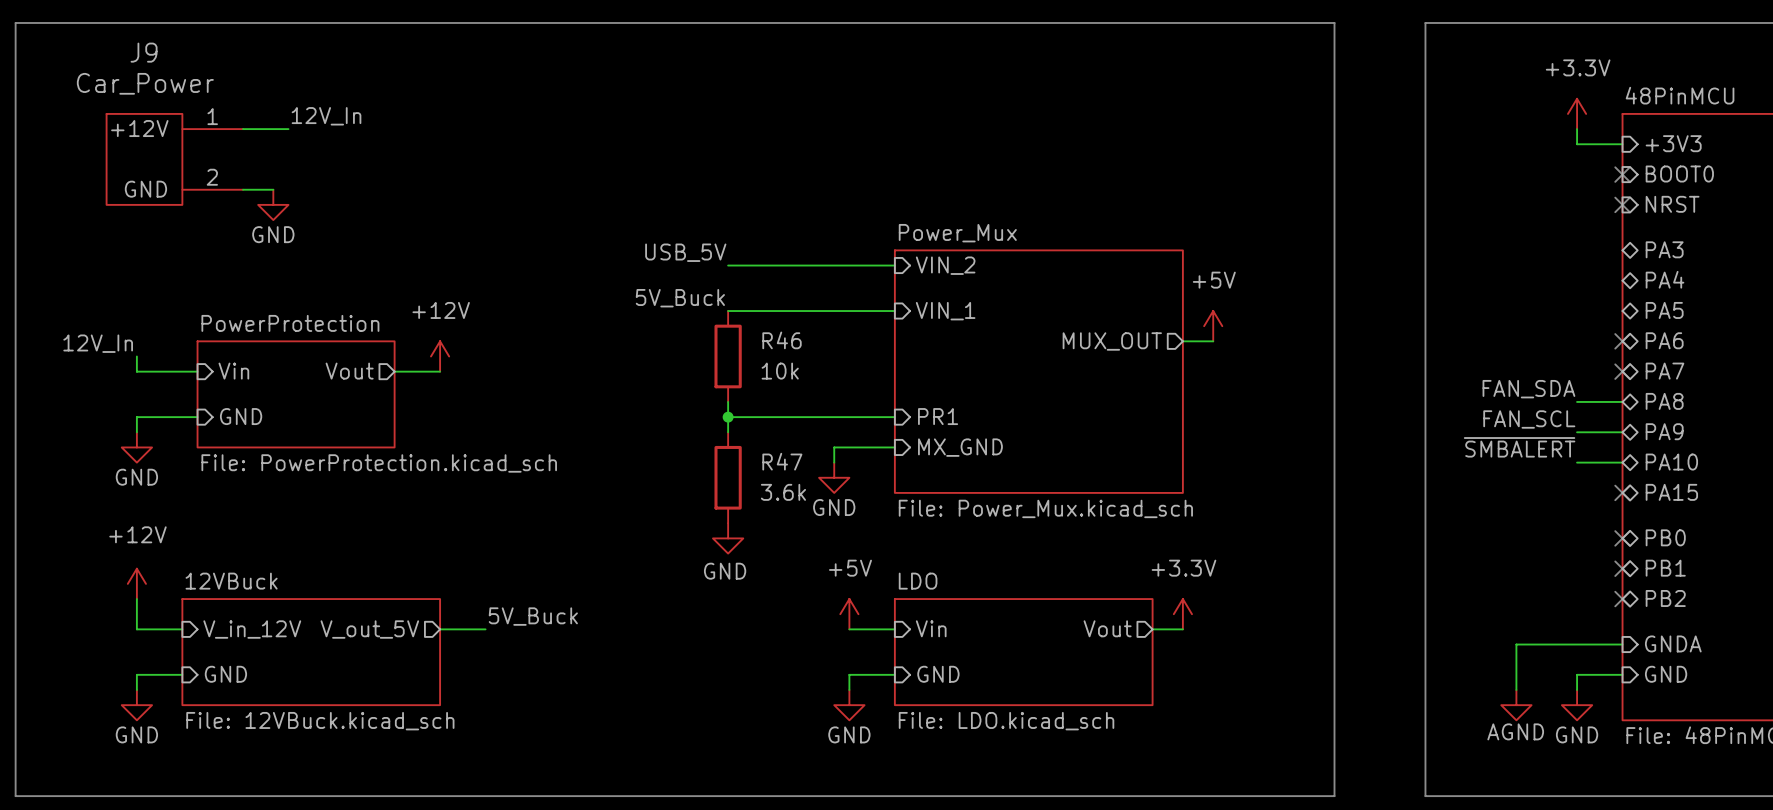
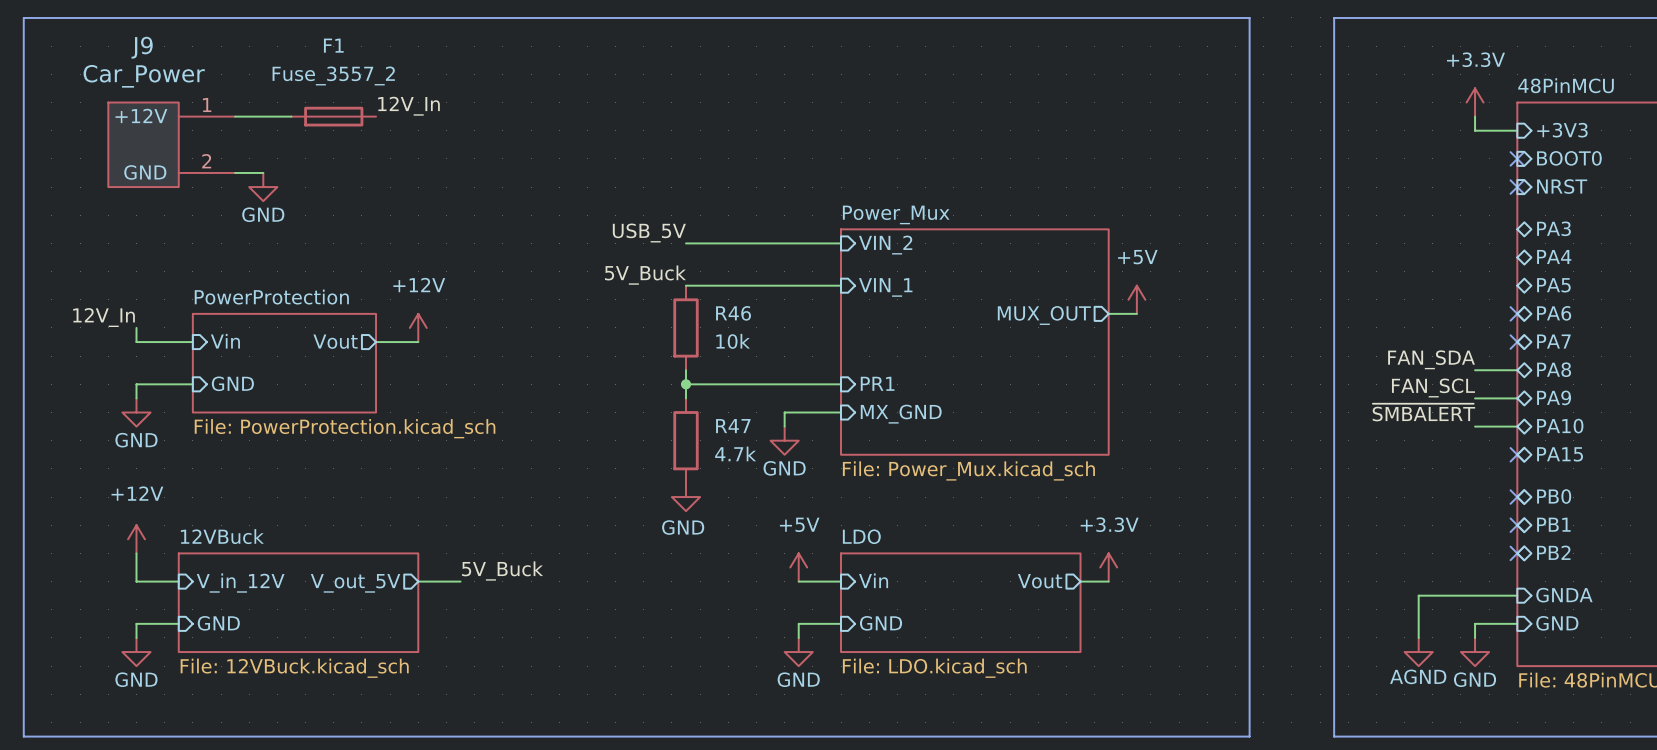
label position: 12V_In (326, 116) -> 12V_In (408, 106)
wire: none -> (277, 116) (291, 116)
F1: none -> Fuse_3557_2 (333, 116)
R47 value: 3.6k (783, 492) -> 4.7k (735, 453)

